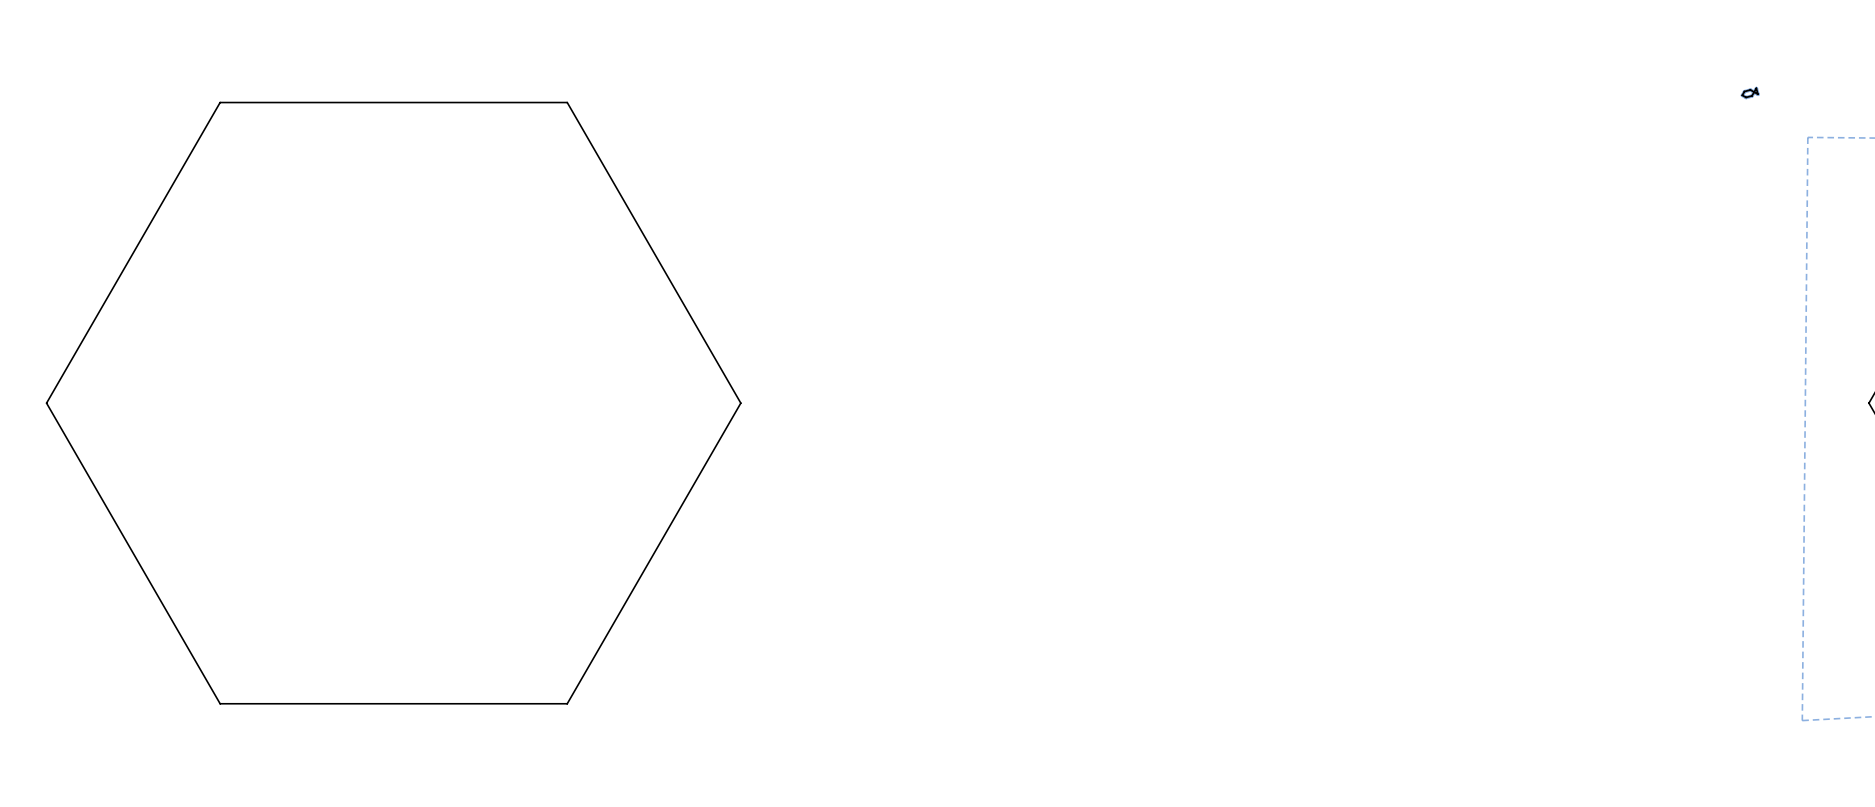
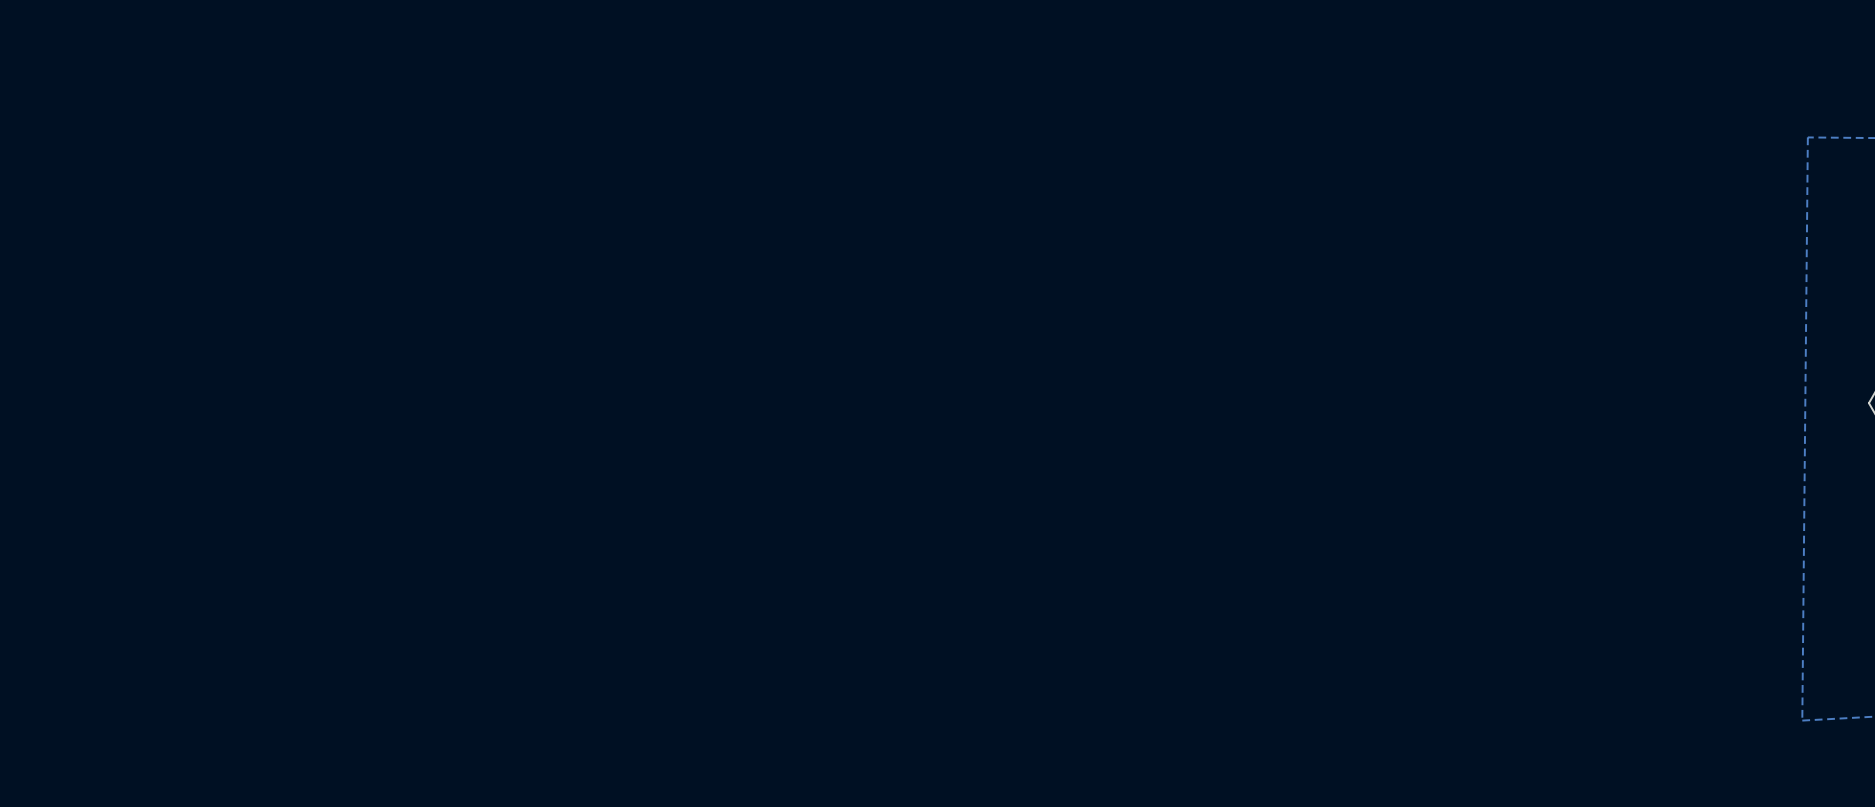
line: (1756, 88) (1757, 94) (1750, 89) (1744, 91) (1742, 95) (1746, 97) (1752, 95) (1756, 88) -> none
track: (1756, 88) (1758, 94) (1750, 90) (1744, 91) (1742, 95) (1746, 97) (1752, 95) (1756, 88) -> none
board edge: (567, 102) (740, 403) (567, 703) (220, 703) (46, 403) (220, 102) (567, 102) -> none

